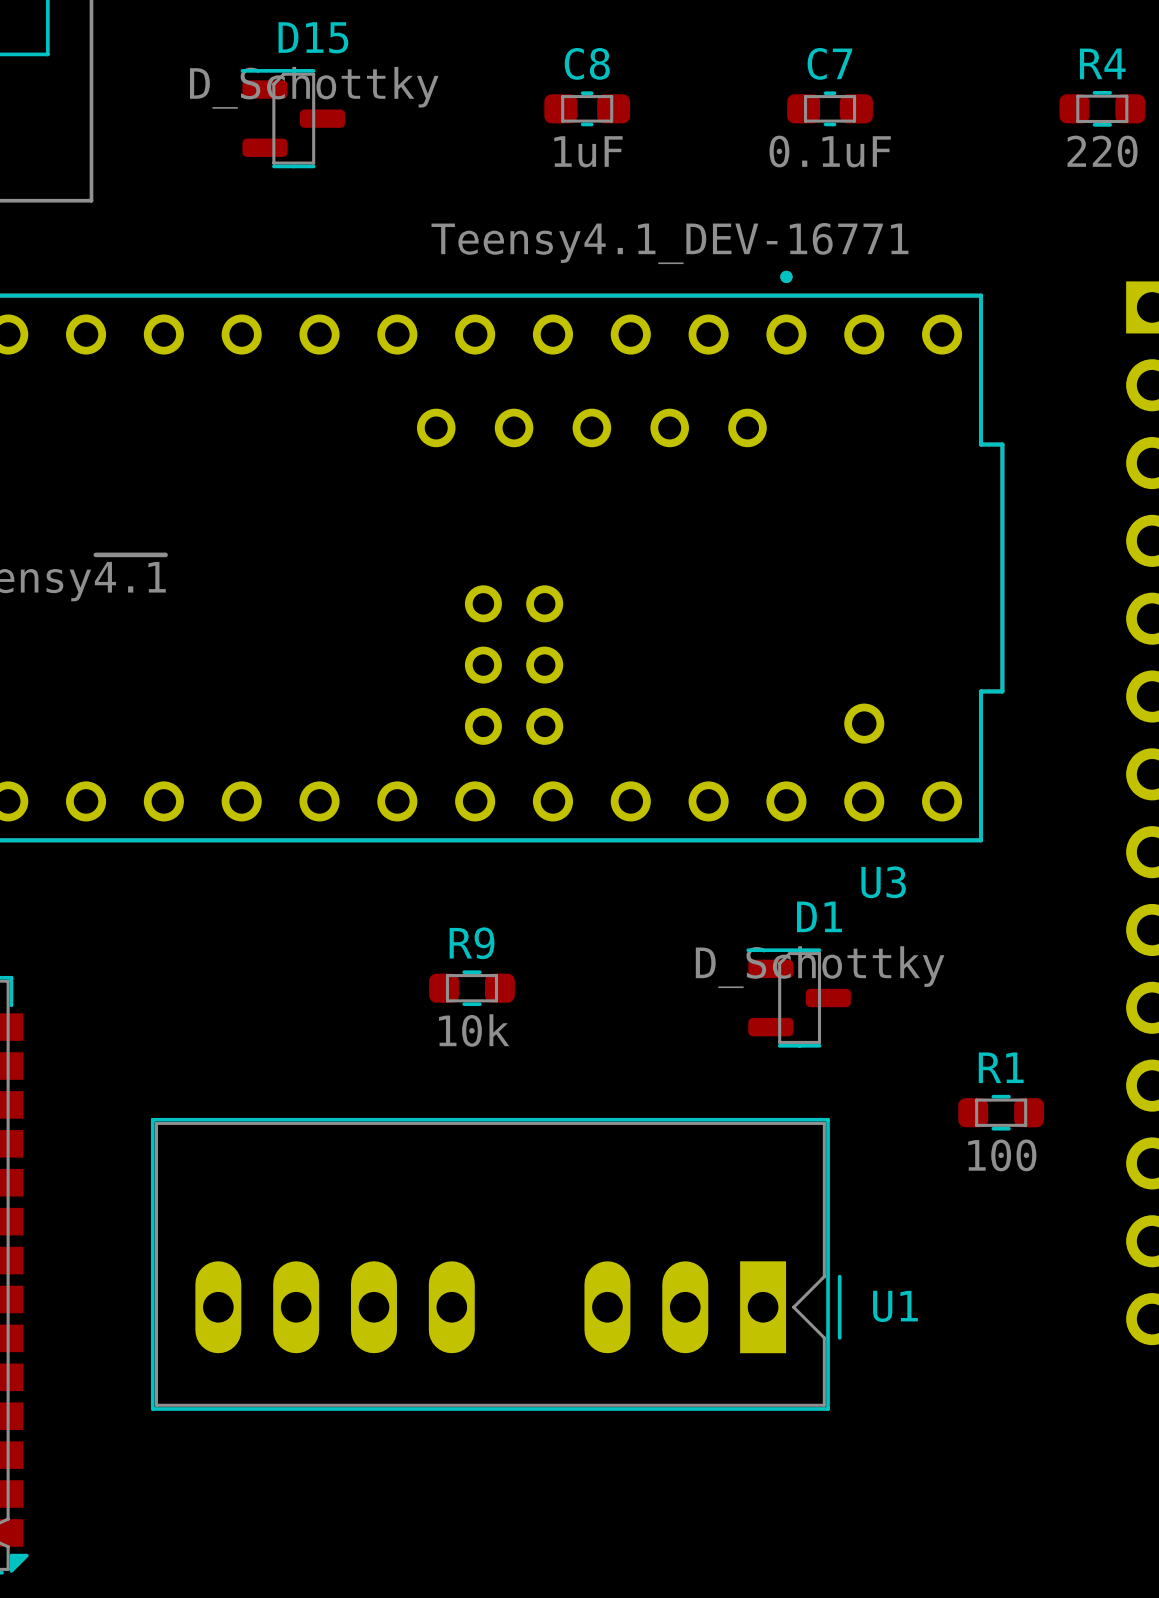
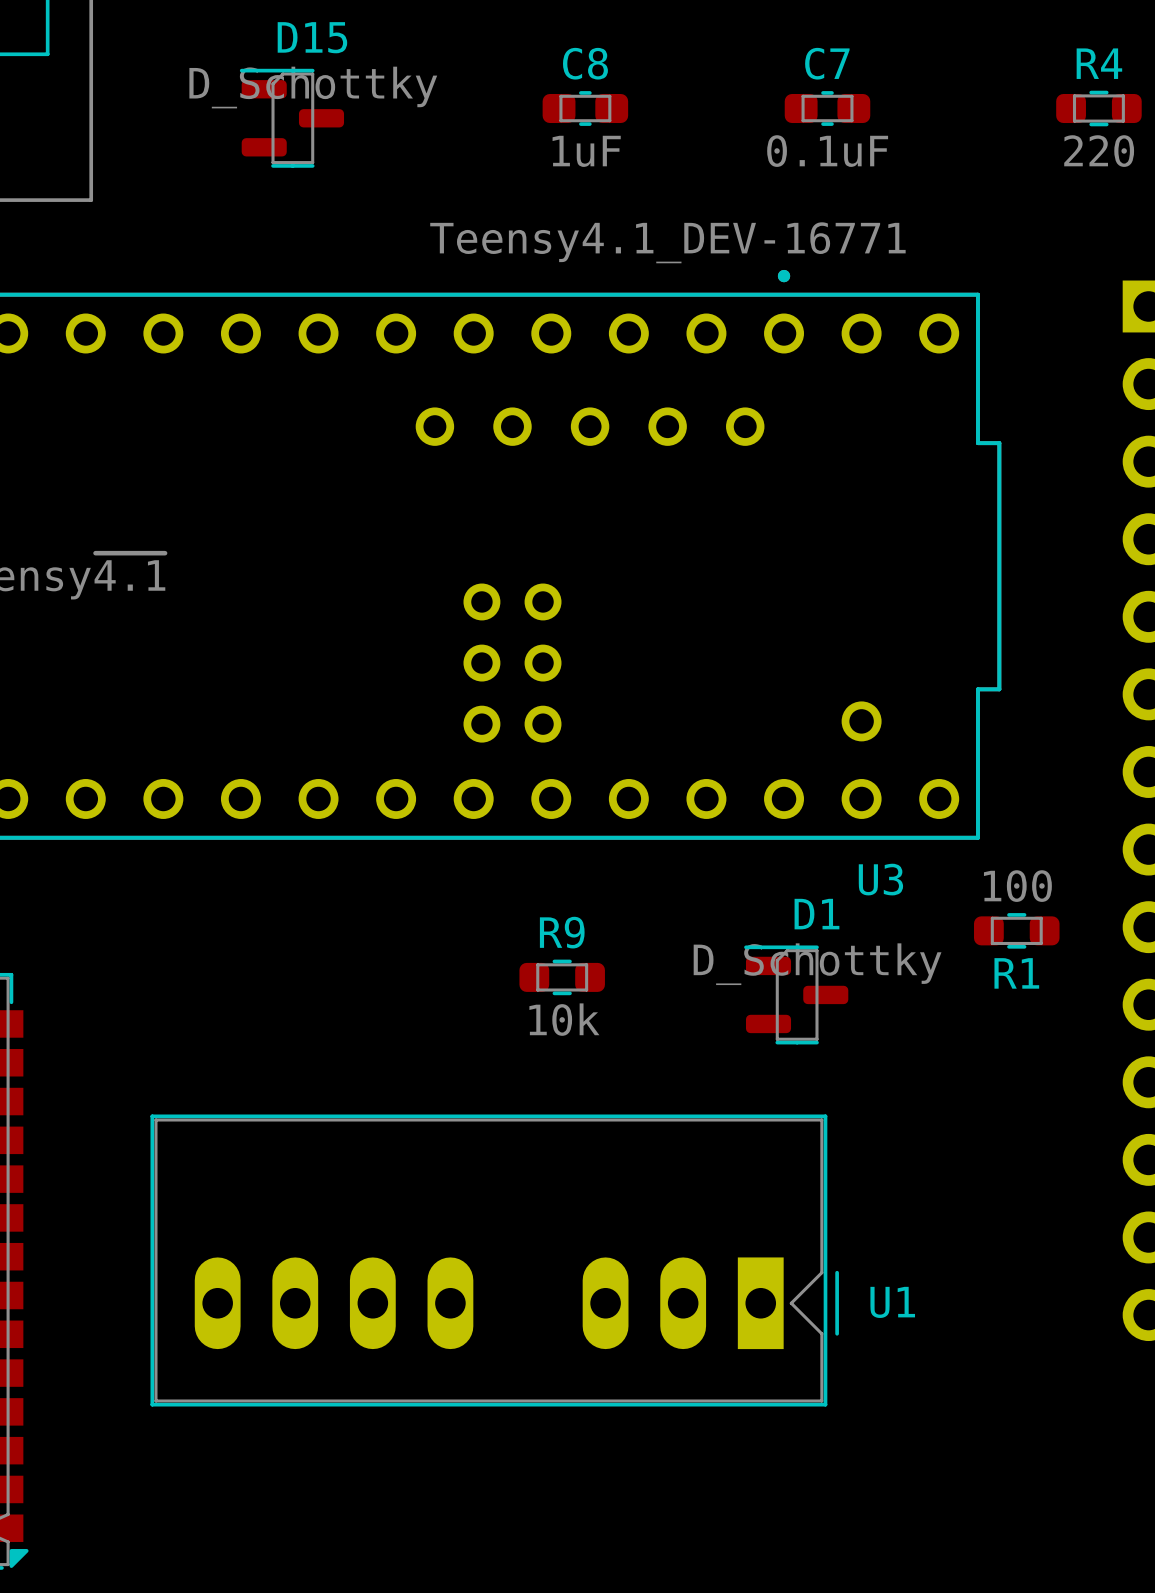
R9 position: (471, 988) -> (562, 977)
R1 name position: R1 (1001, 1067) -> R1 (1016, 973)
R1 position: (1001, 1112) -> (1016, 930)
R1 value position: 100 (1002, 1155) -> 100 (1017, 886)

